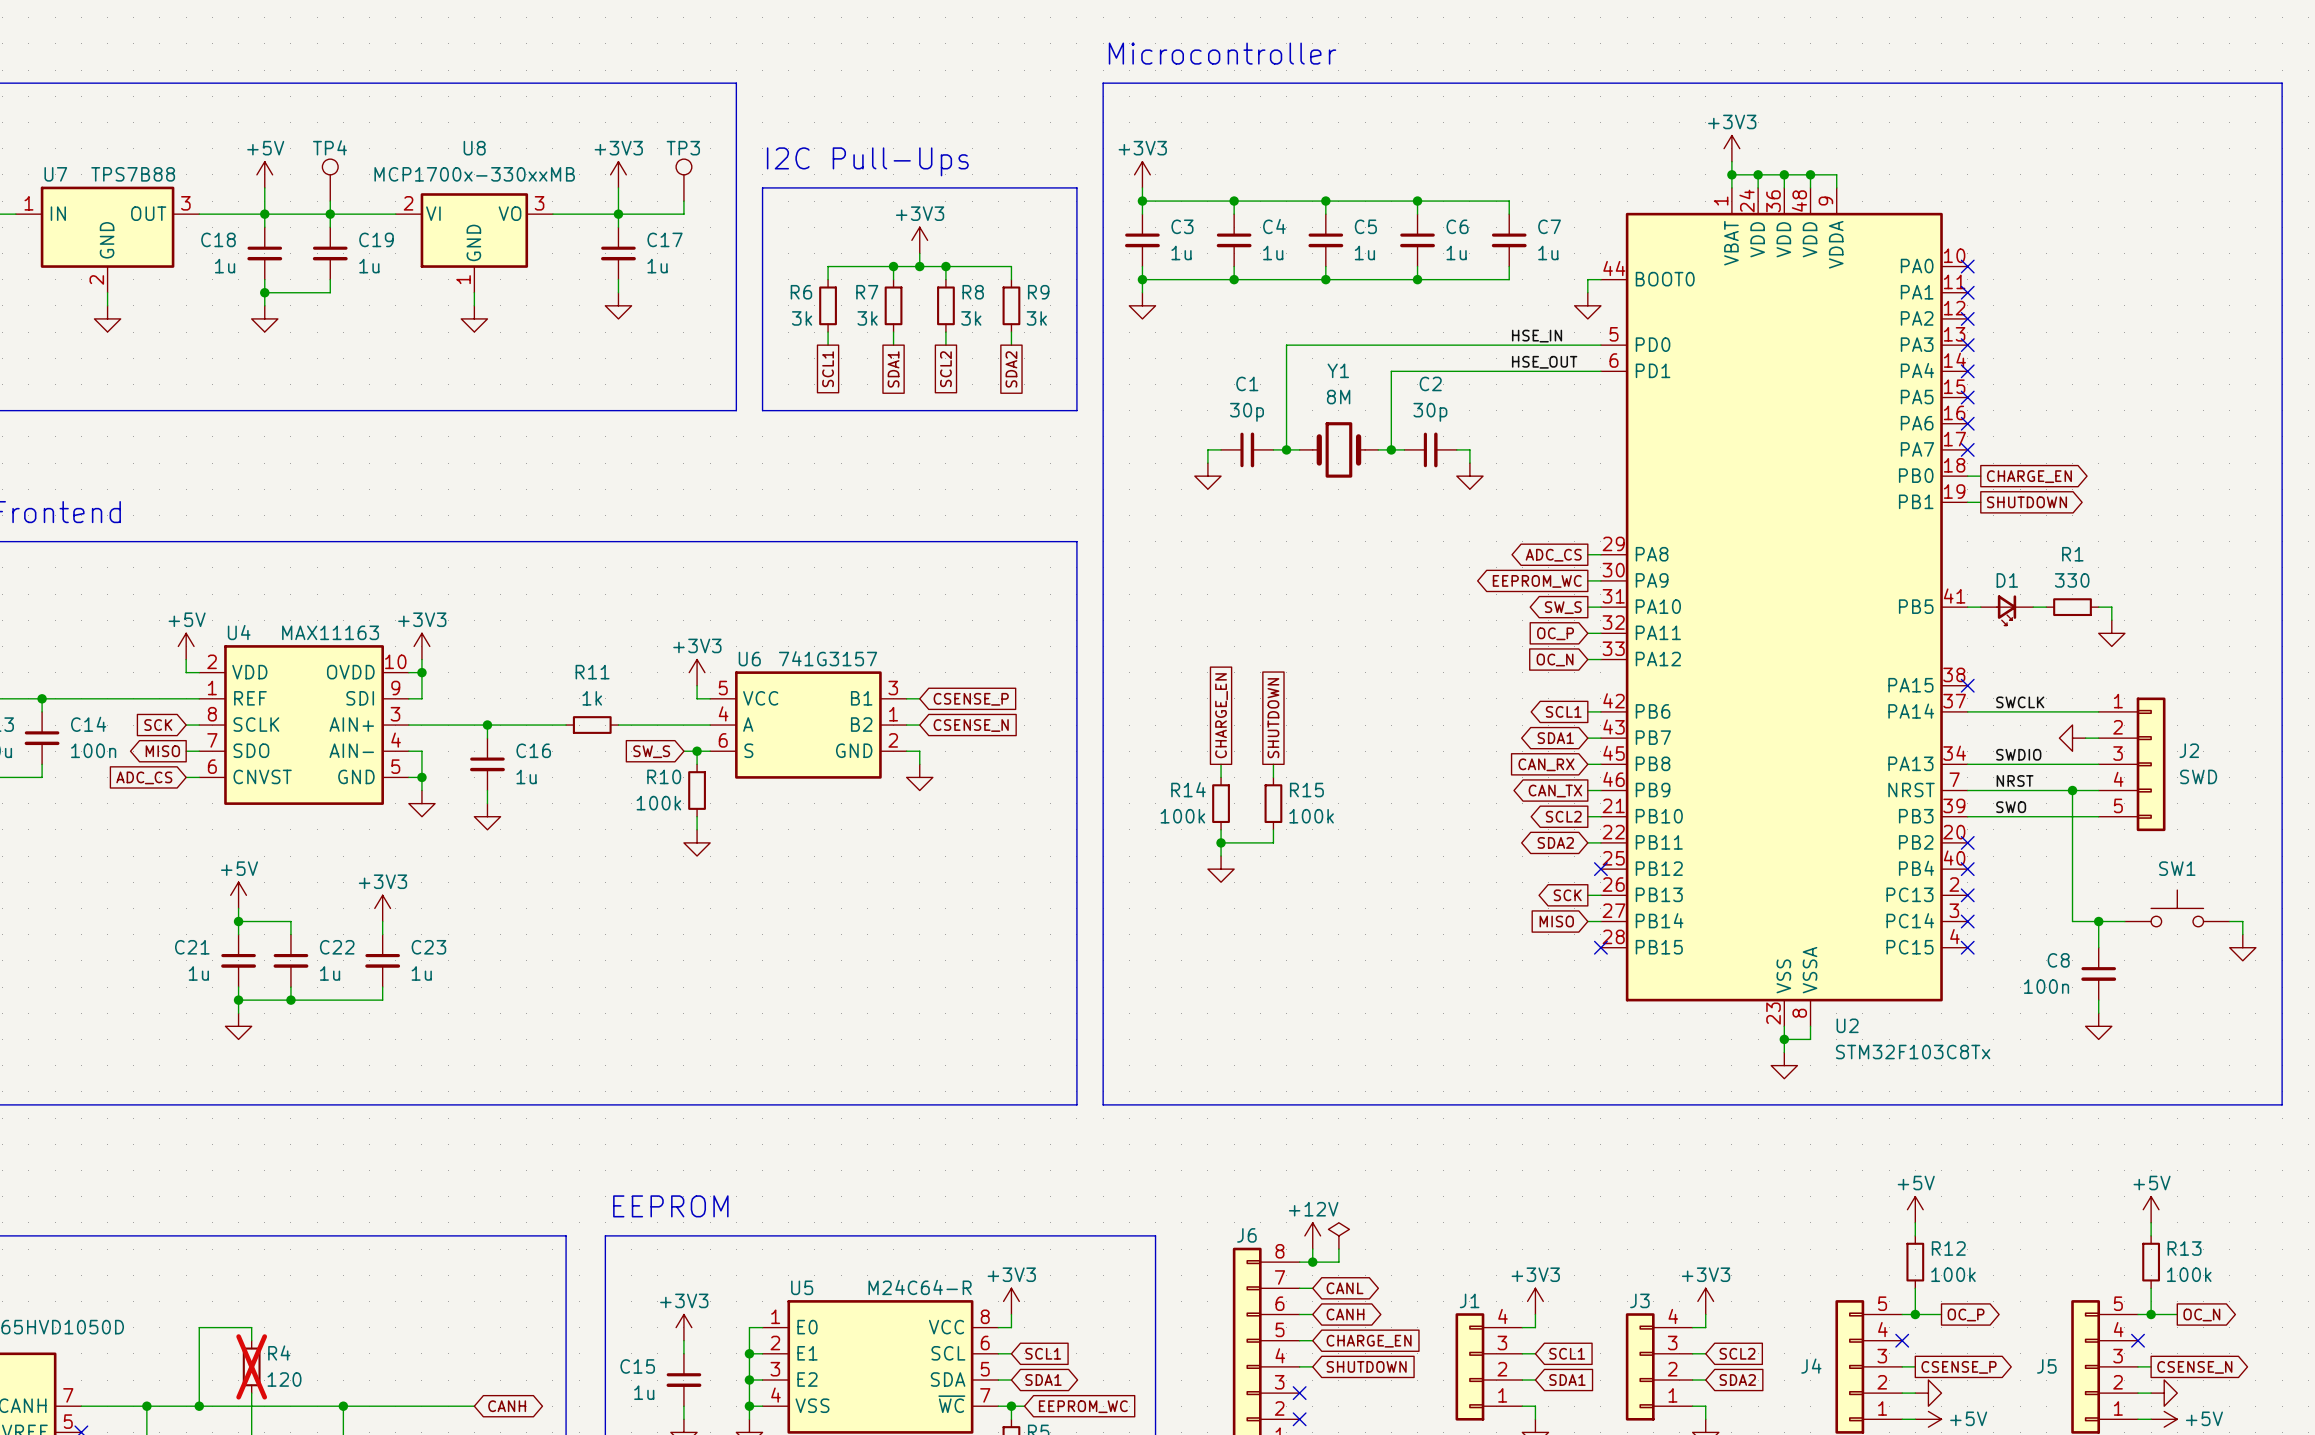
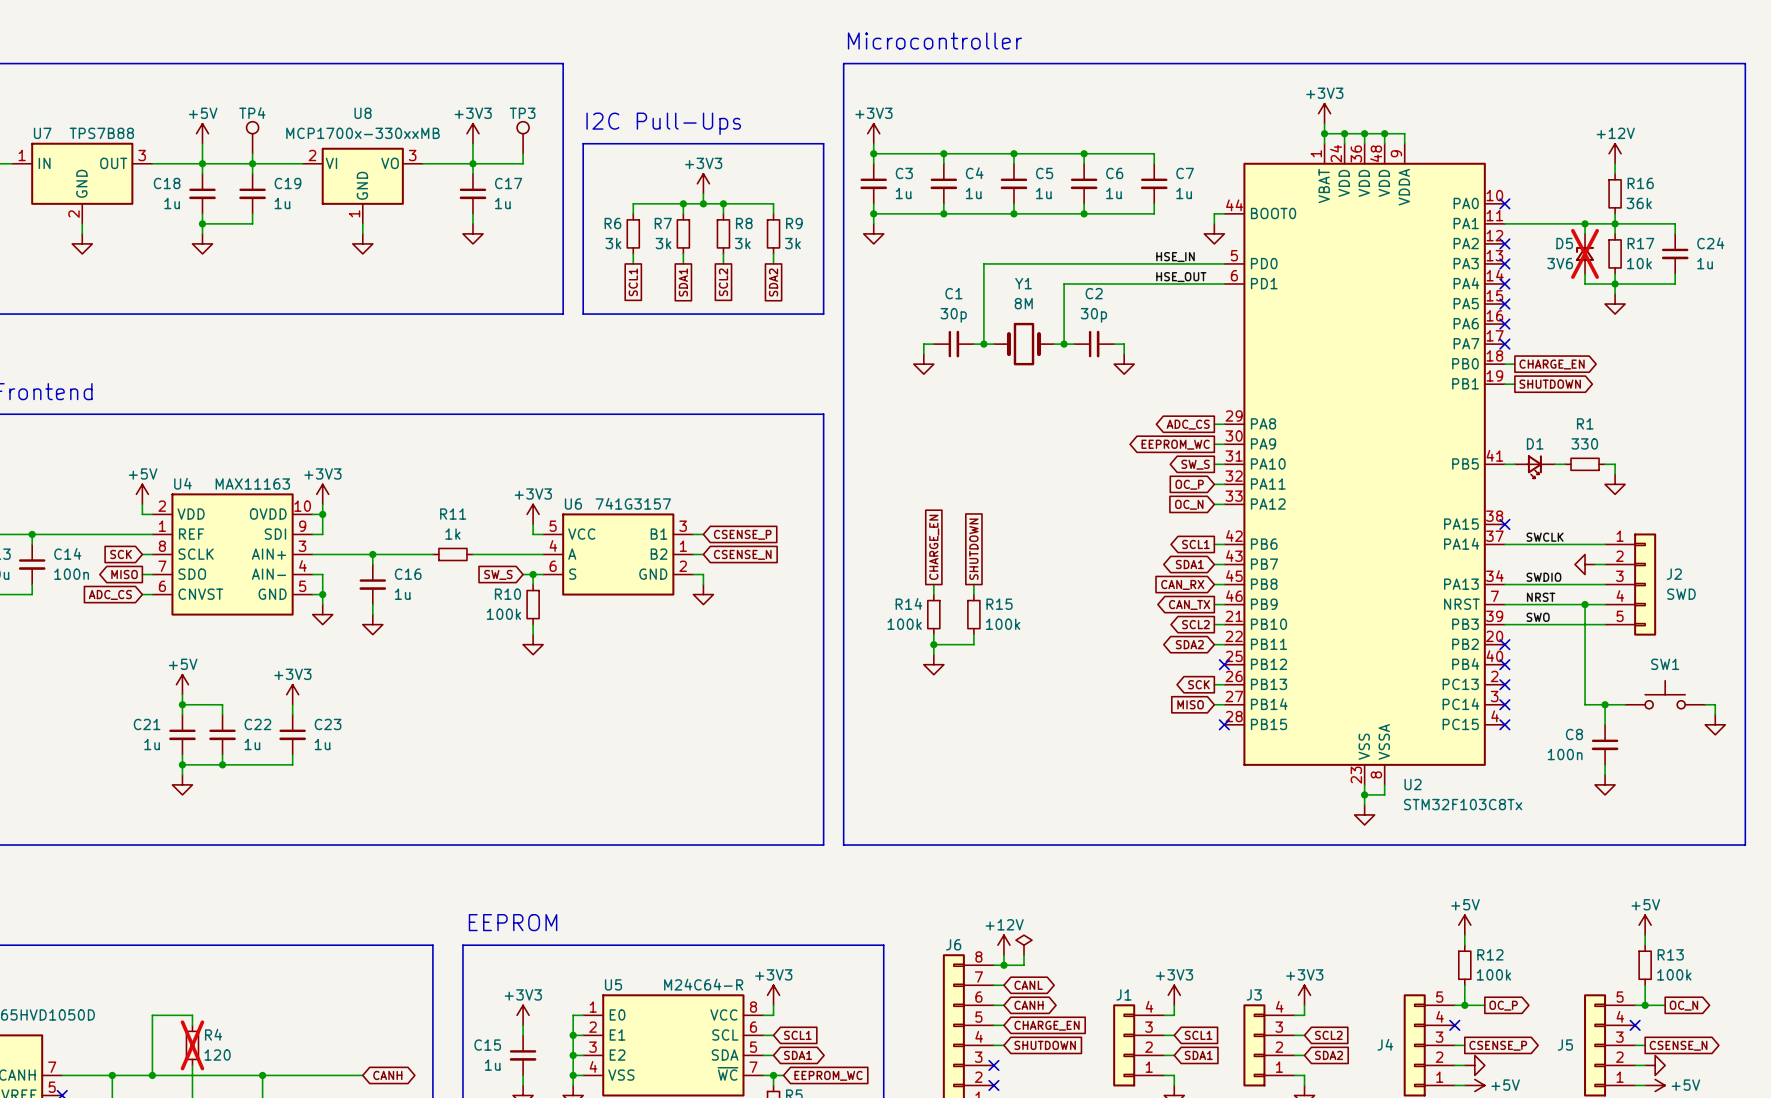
power symbol: none -> +12V (1615, 153)
wire: none -> (1615, 163) (1615, 173)
R16: none -> 36k (1615, 193)
wire: none -> (1615, 213) (1615, 233)
wire: none -> (1504, 223) (1675, 223) (1675, 233)
no-connect mark: (1967, 292) -> none
wire: none -> (1585, 223) (1585, 233)
junction: none -> (1585, 223)
junction: none -> (1615, 223)
D5: none -> 3V6 (1585, 253)
R17: none -> 10k (1615, 253)
C24: none -> 1u (1675, 253)
wire: none -> (1585, 273) (1585, 283) (1675, 283) (1675, 273)
wire: none -> (1615, 273) (1615, 294)
junction: none -> (1615, 283)
power symbol: none -> (1615, 304)

